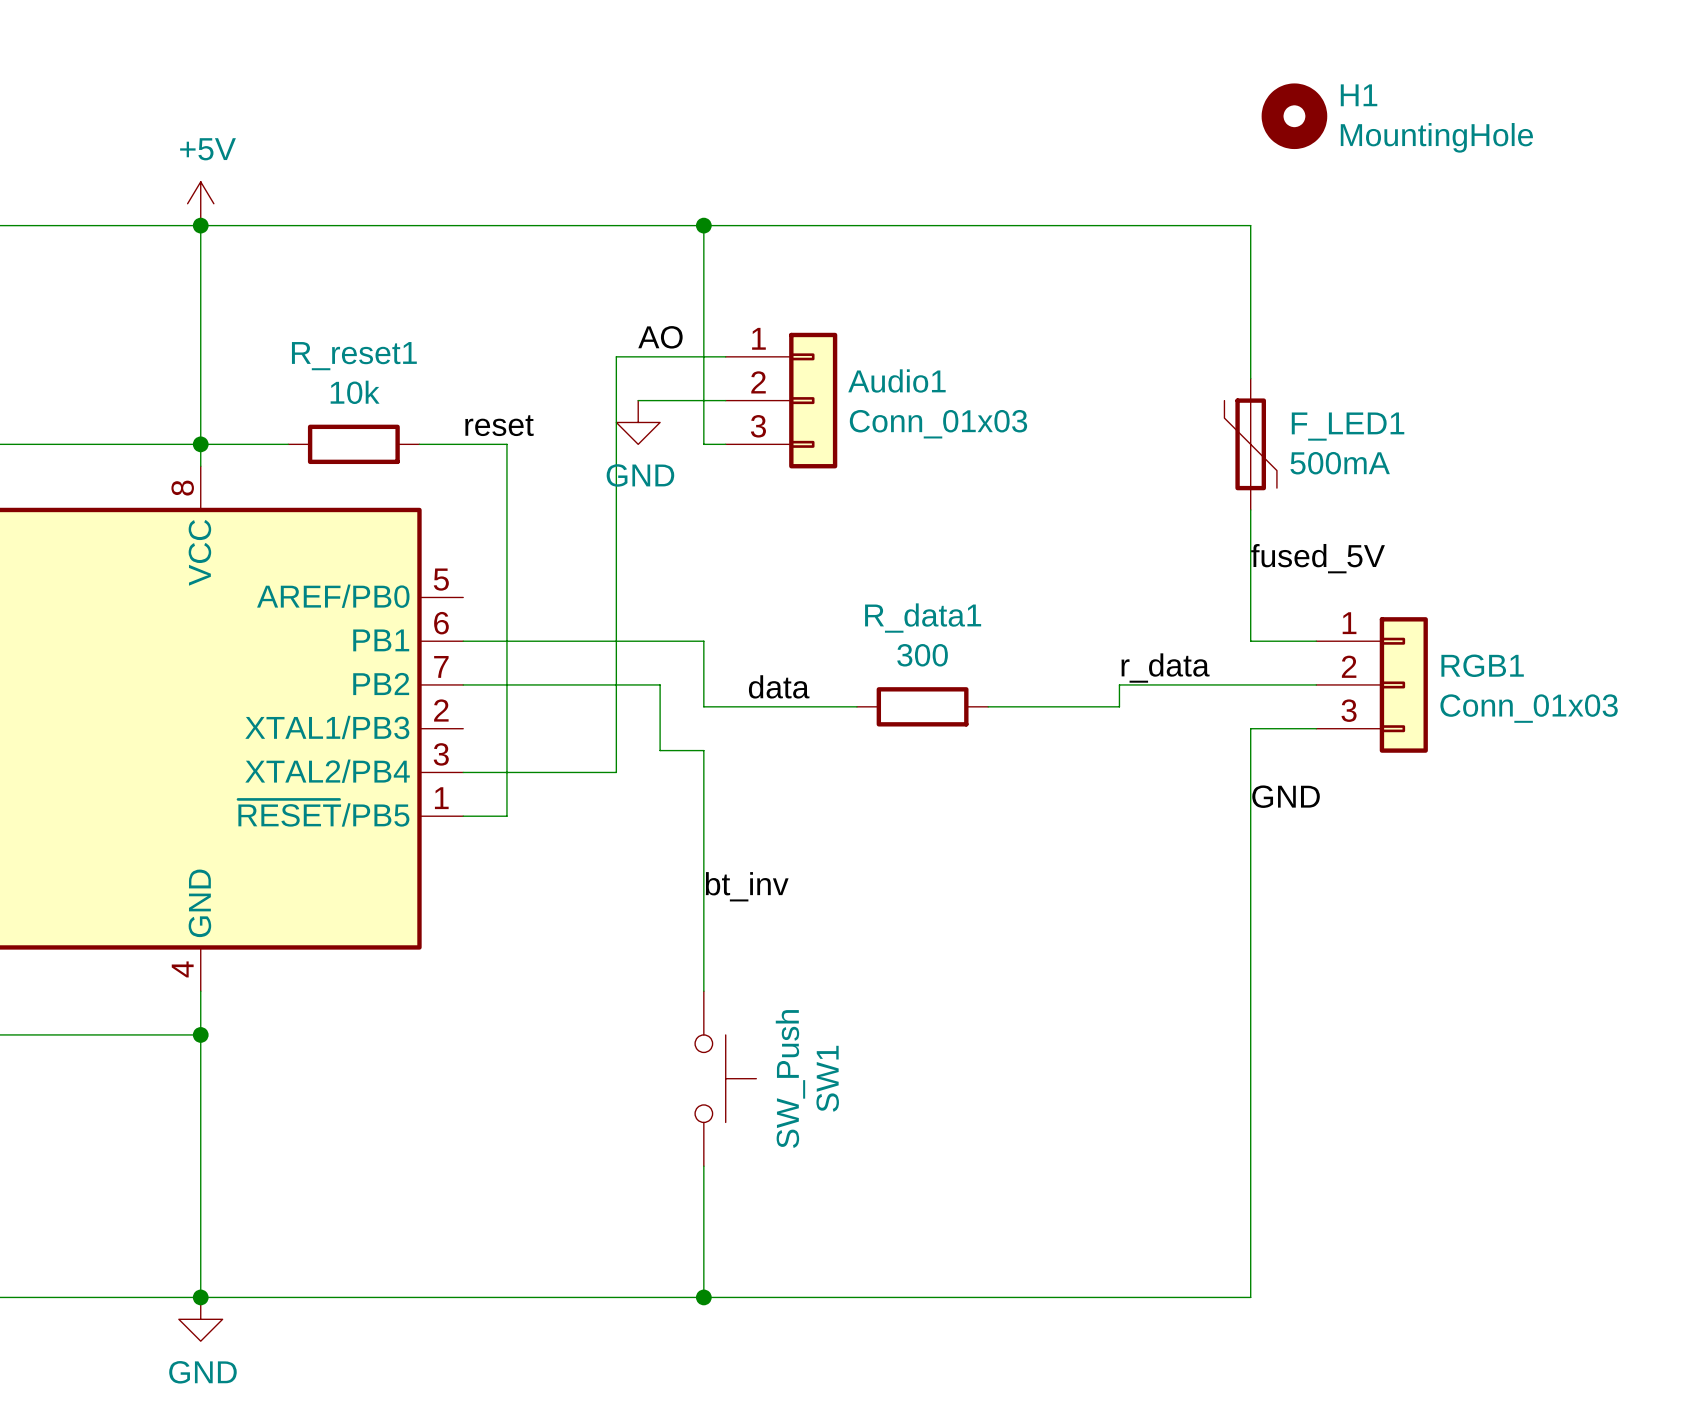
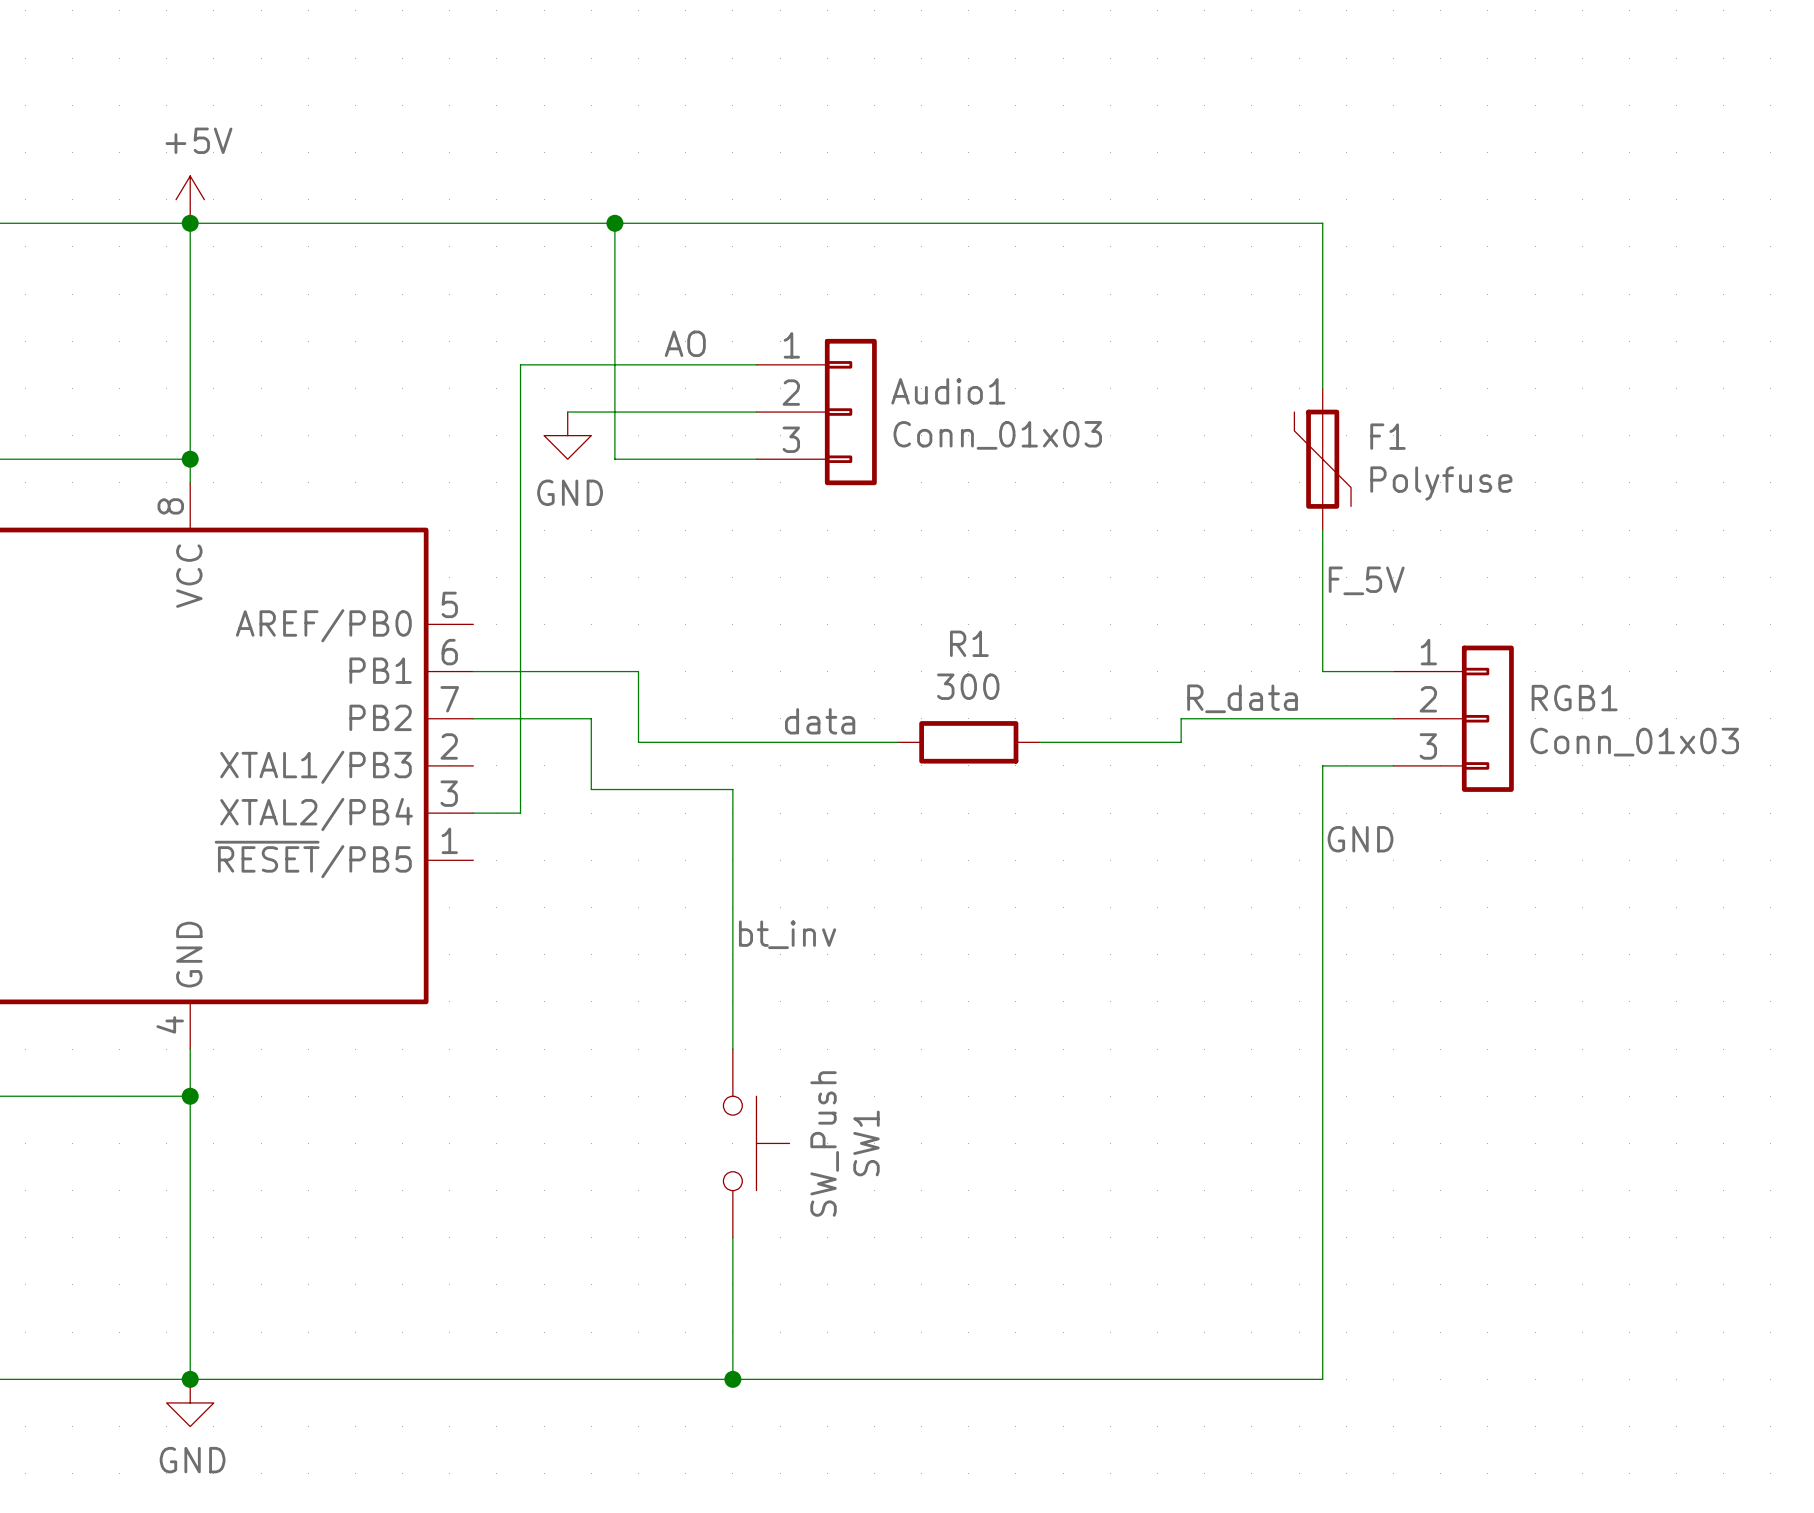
H1: MountingHole (1294, 116) -> none
junction: none -> (614, 223)
wire: (703, 225) (703, 444) -> (614, 223) (614, 459) (732, 459)
junction: (703, 225) -> none
wire: (616, 356) (616, 641) (703, 641) (703, 706) -> none
power symbol position: GND (638, 422) -> GND (567, 435)
label: reset (499, 425) -> none
F_LED1 name: F_LED1 (1348, 426) -> F1 (1388, 436)
wire: (200, 444) (288, 444) -> (567, 412) (662, 412)
R_reset1: 10k (353, 444) -> none
wire: (419, 444) (506, 444) -> (638, 364) (520, 364) (520, 459)
F_LED1 value: 500mA (1340, 463) -> Polyfuse (1441, 483)
label: fused_5V (1318, 558) -> F_5V (1366, 580)
R_data1 name: R_data1 (923, 618) -> R1 (969, 643)
label: r_data (1165, 668) -> R_data (1242, 698)
wire: (572, 684) (660, 684) (660, 750) -> (591, 718) (591, 789) (685, 789)
wire: (616, 706) (616, 772) (506, 772) (506, 816) (463, 816) -> (638, 742) (732, 742)

